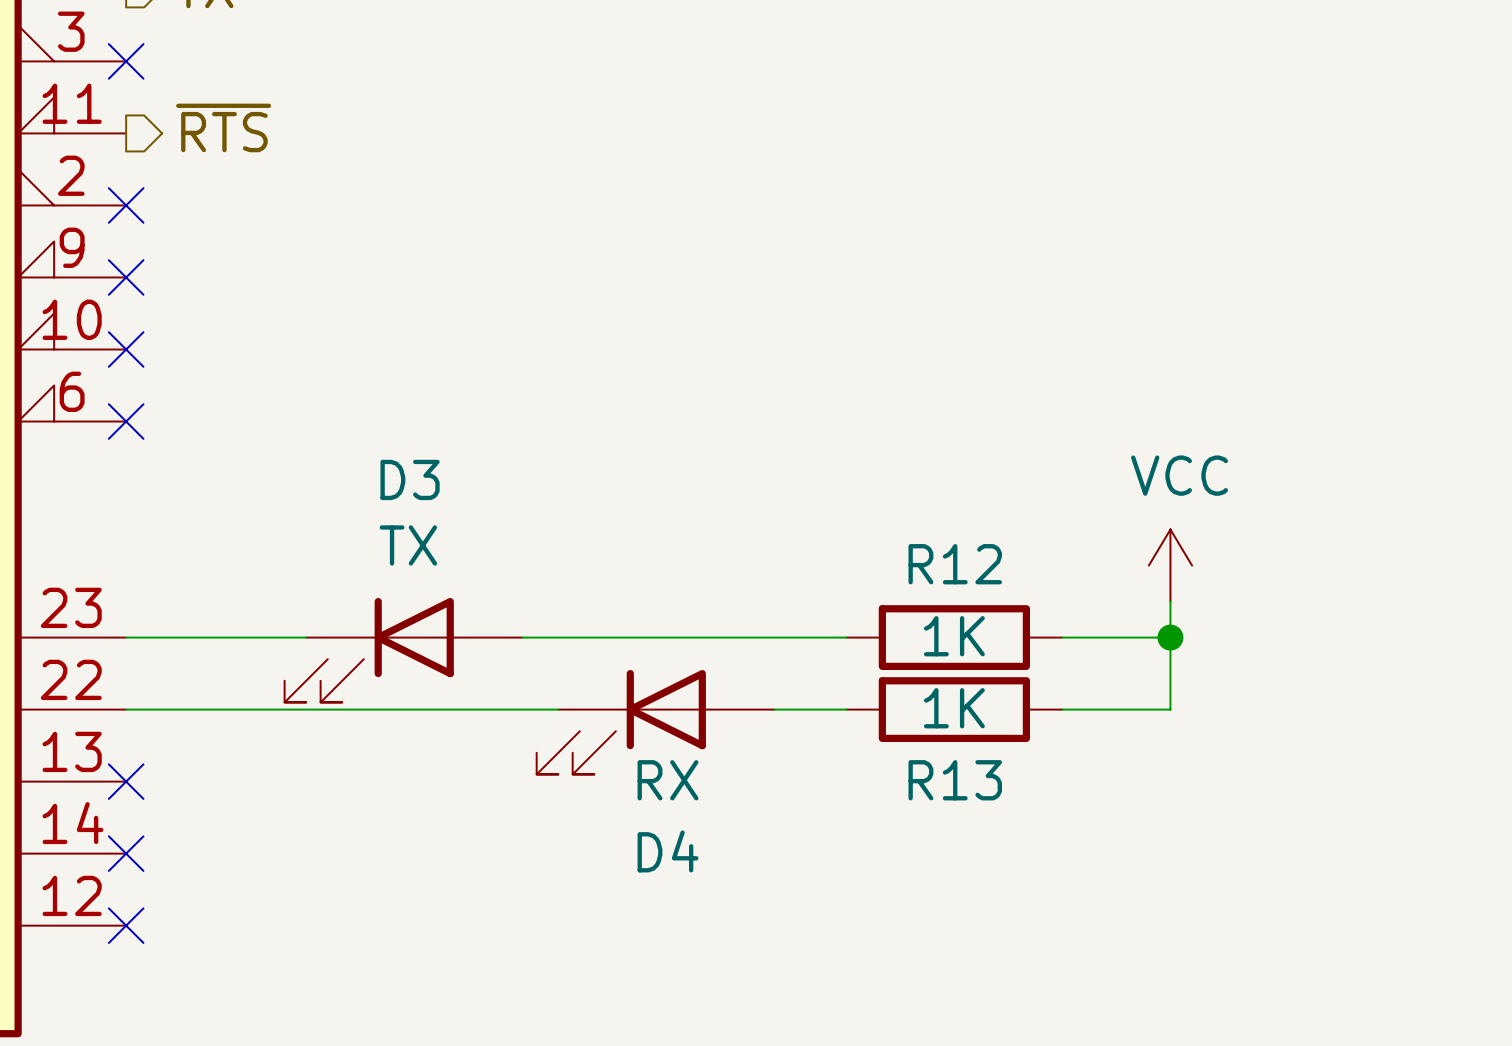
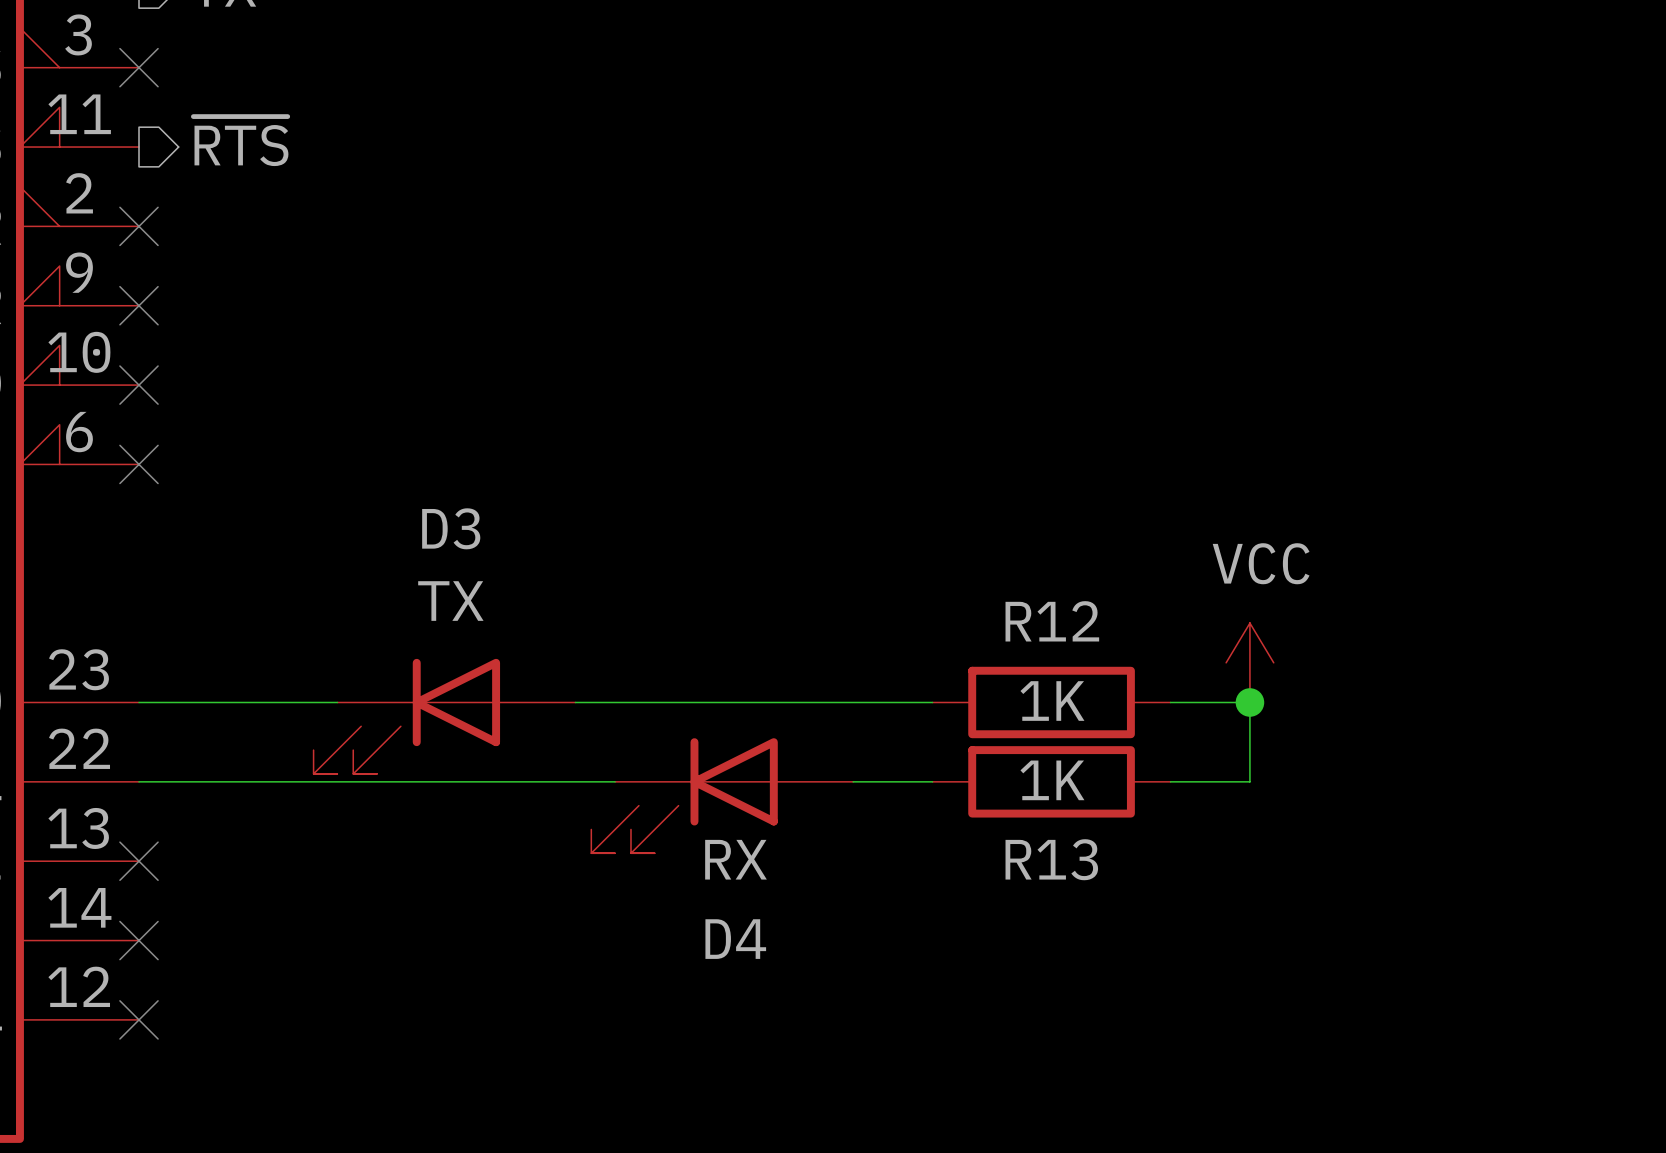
power symbol position: VCC (1170, 565) -> VCC (1249, 662)
wire: (1170, 601) (1170, 709) (1134, 709) -> (1249, 702) (1249, 781)
wire: (1134, 637) (1170, 637) -> none
junction position: (1170, 637) -> (1249, 702)

